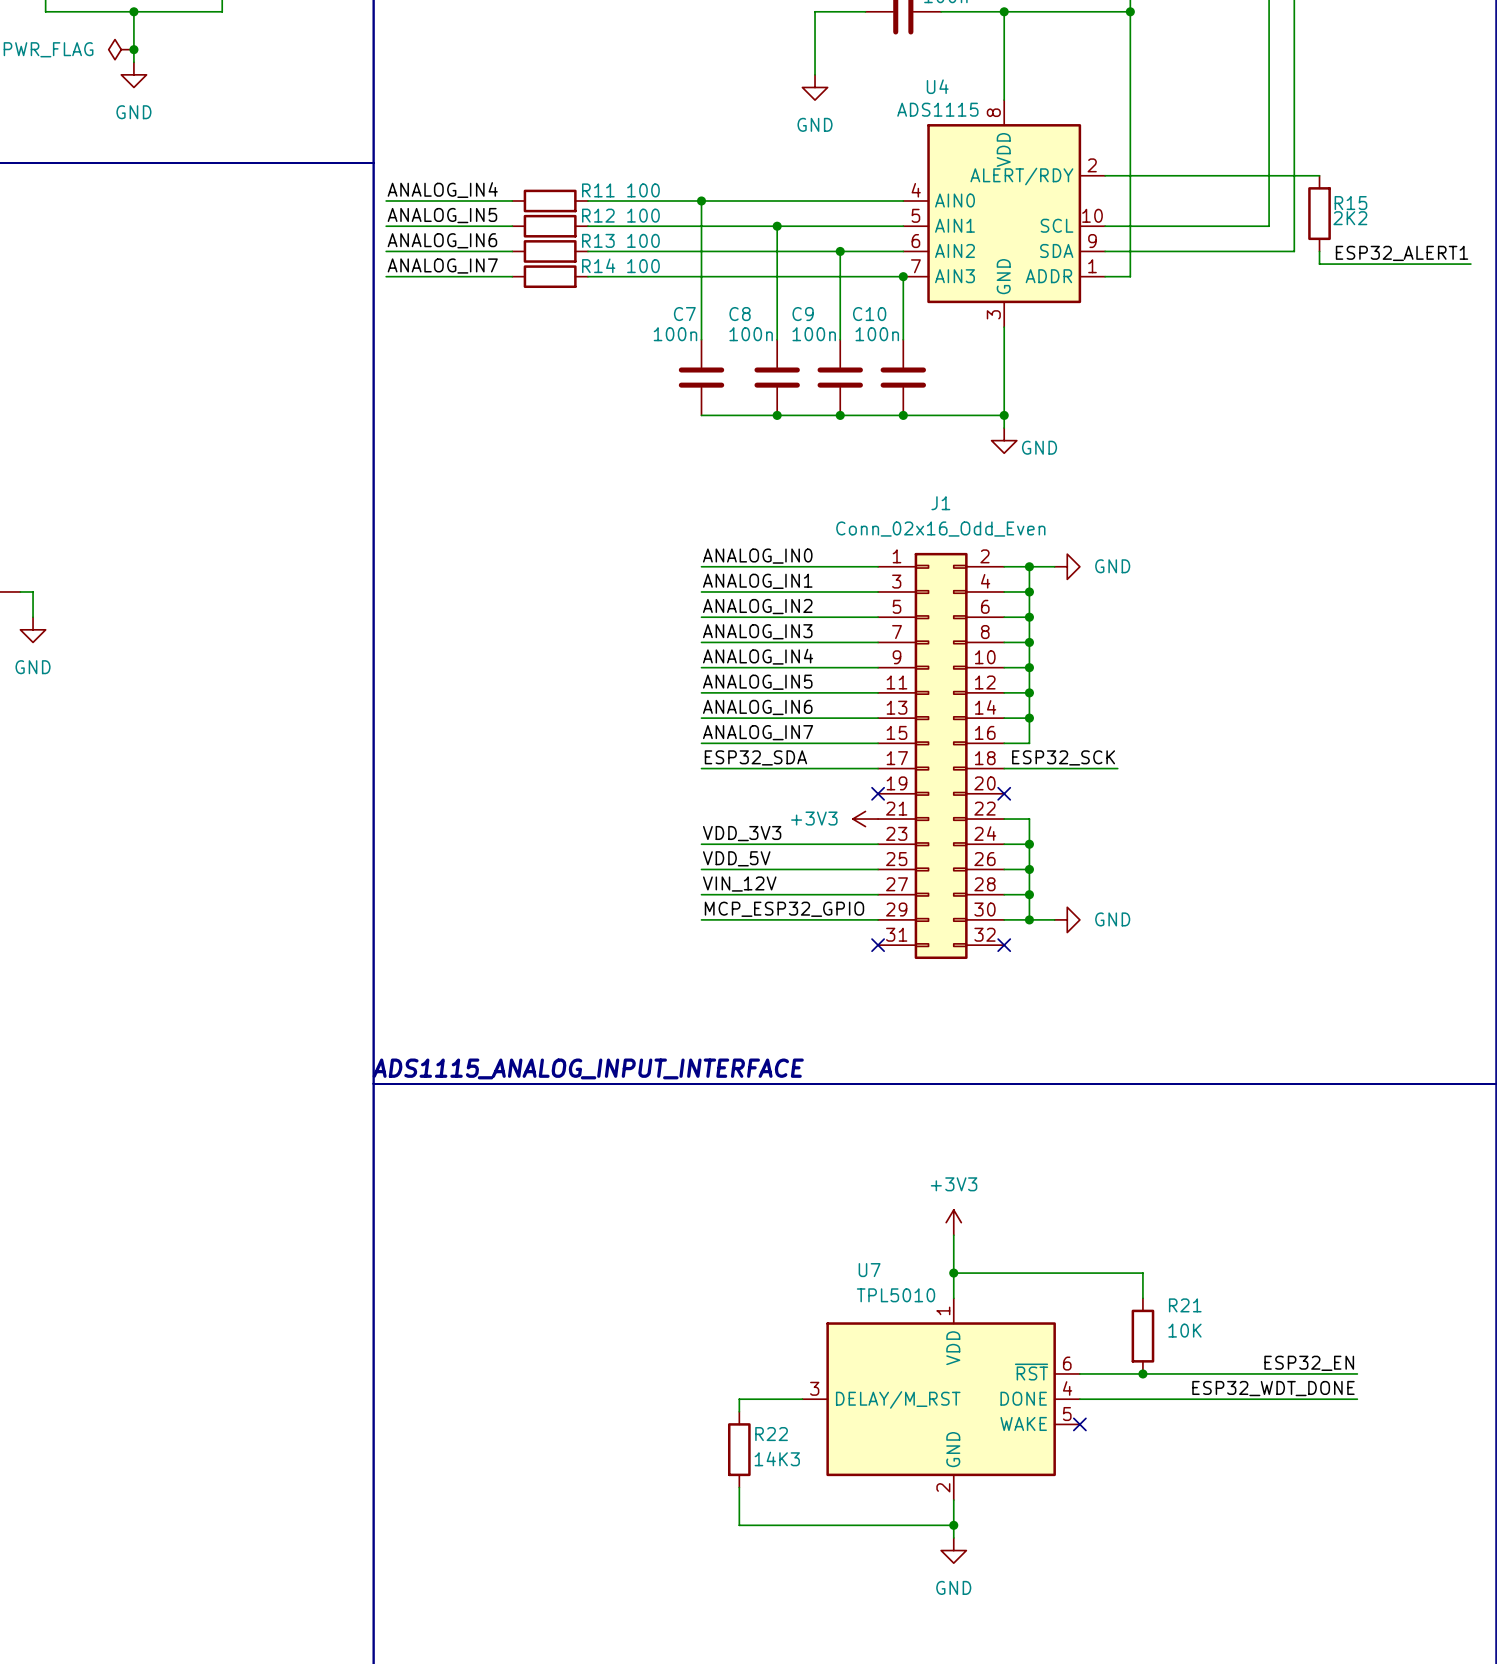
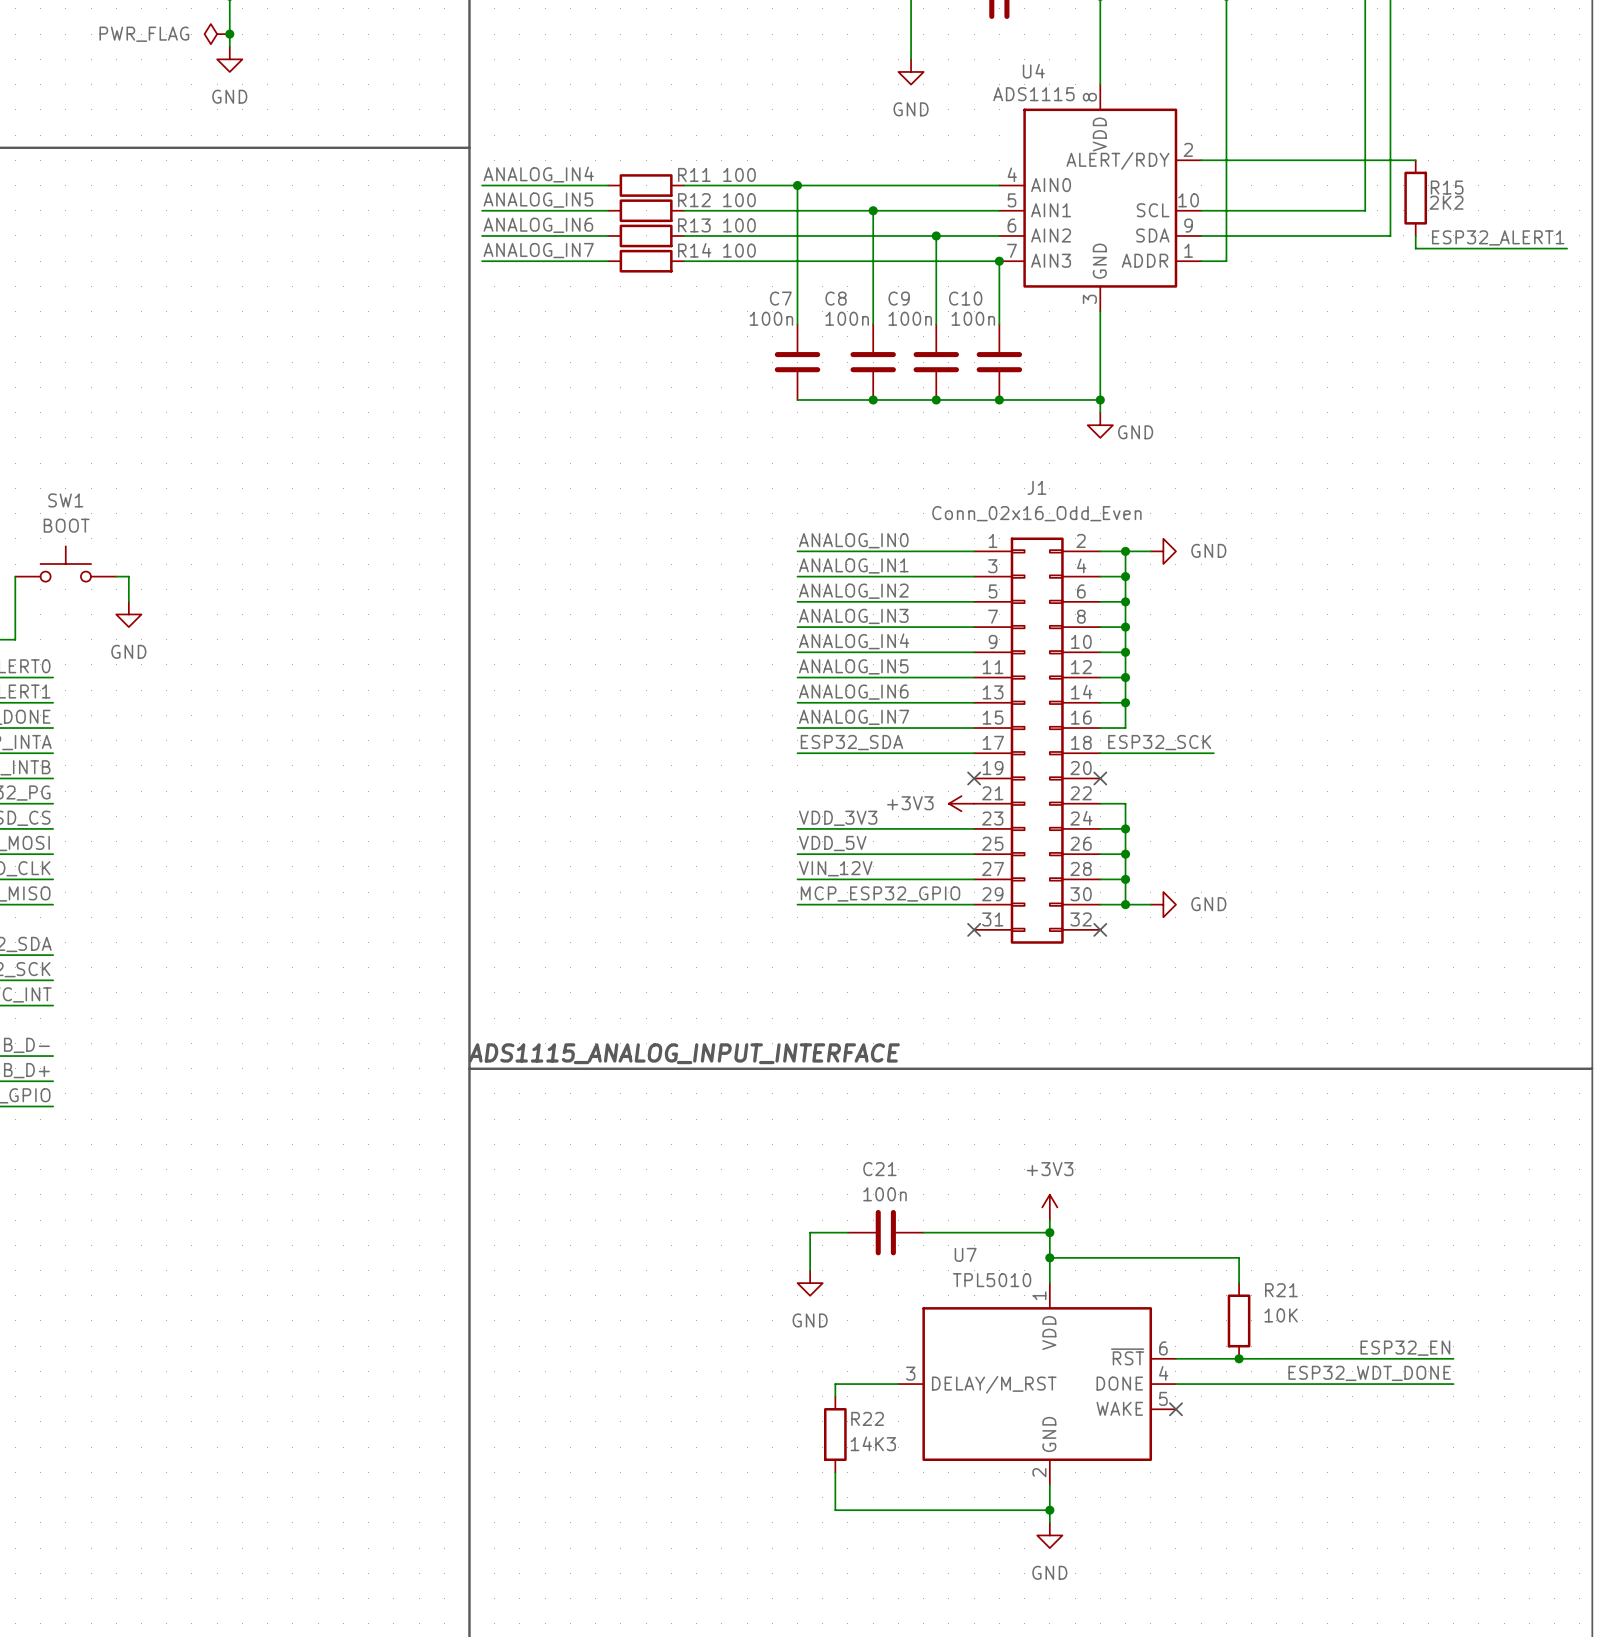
wire: none -> (847, 1232) (810, 1232) (810, 1270)
C21: none -> 100n (885, 1232)
wire: none -> (923, 1232) (1049, 1232)
junction: none -> (1049, 1232)
power symbol: none -> GND (810, 1283)

